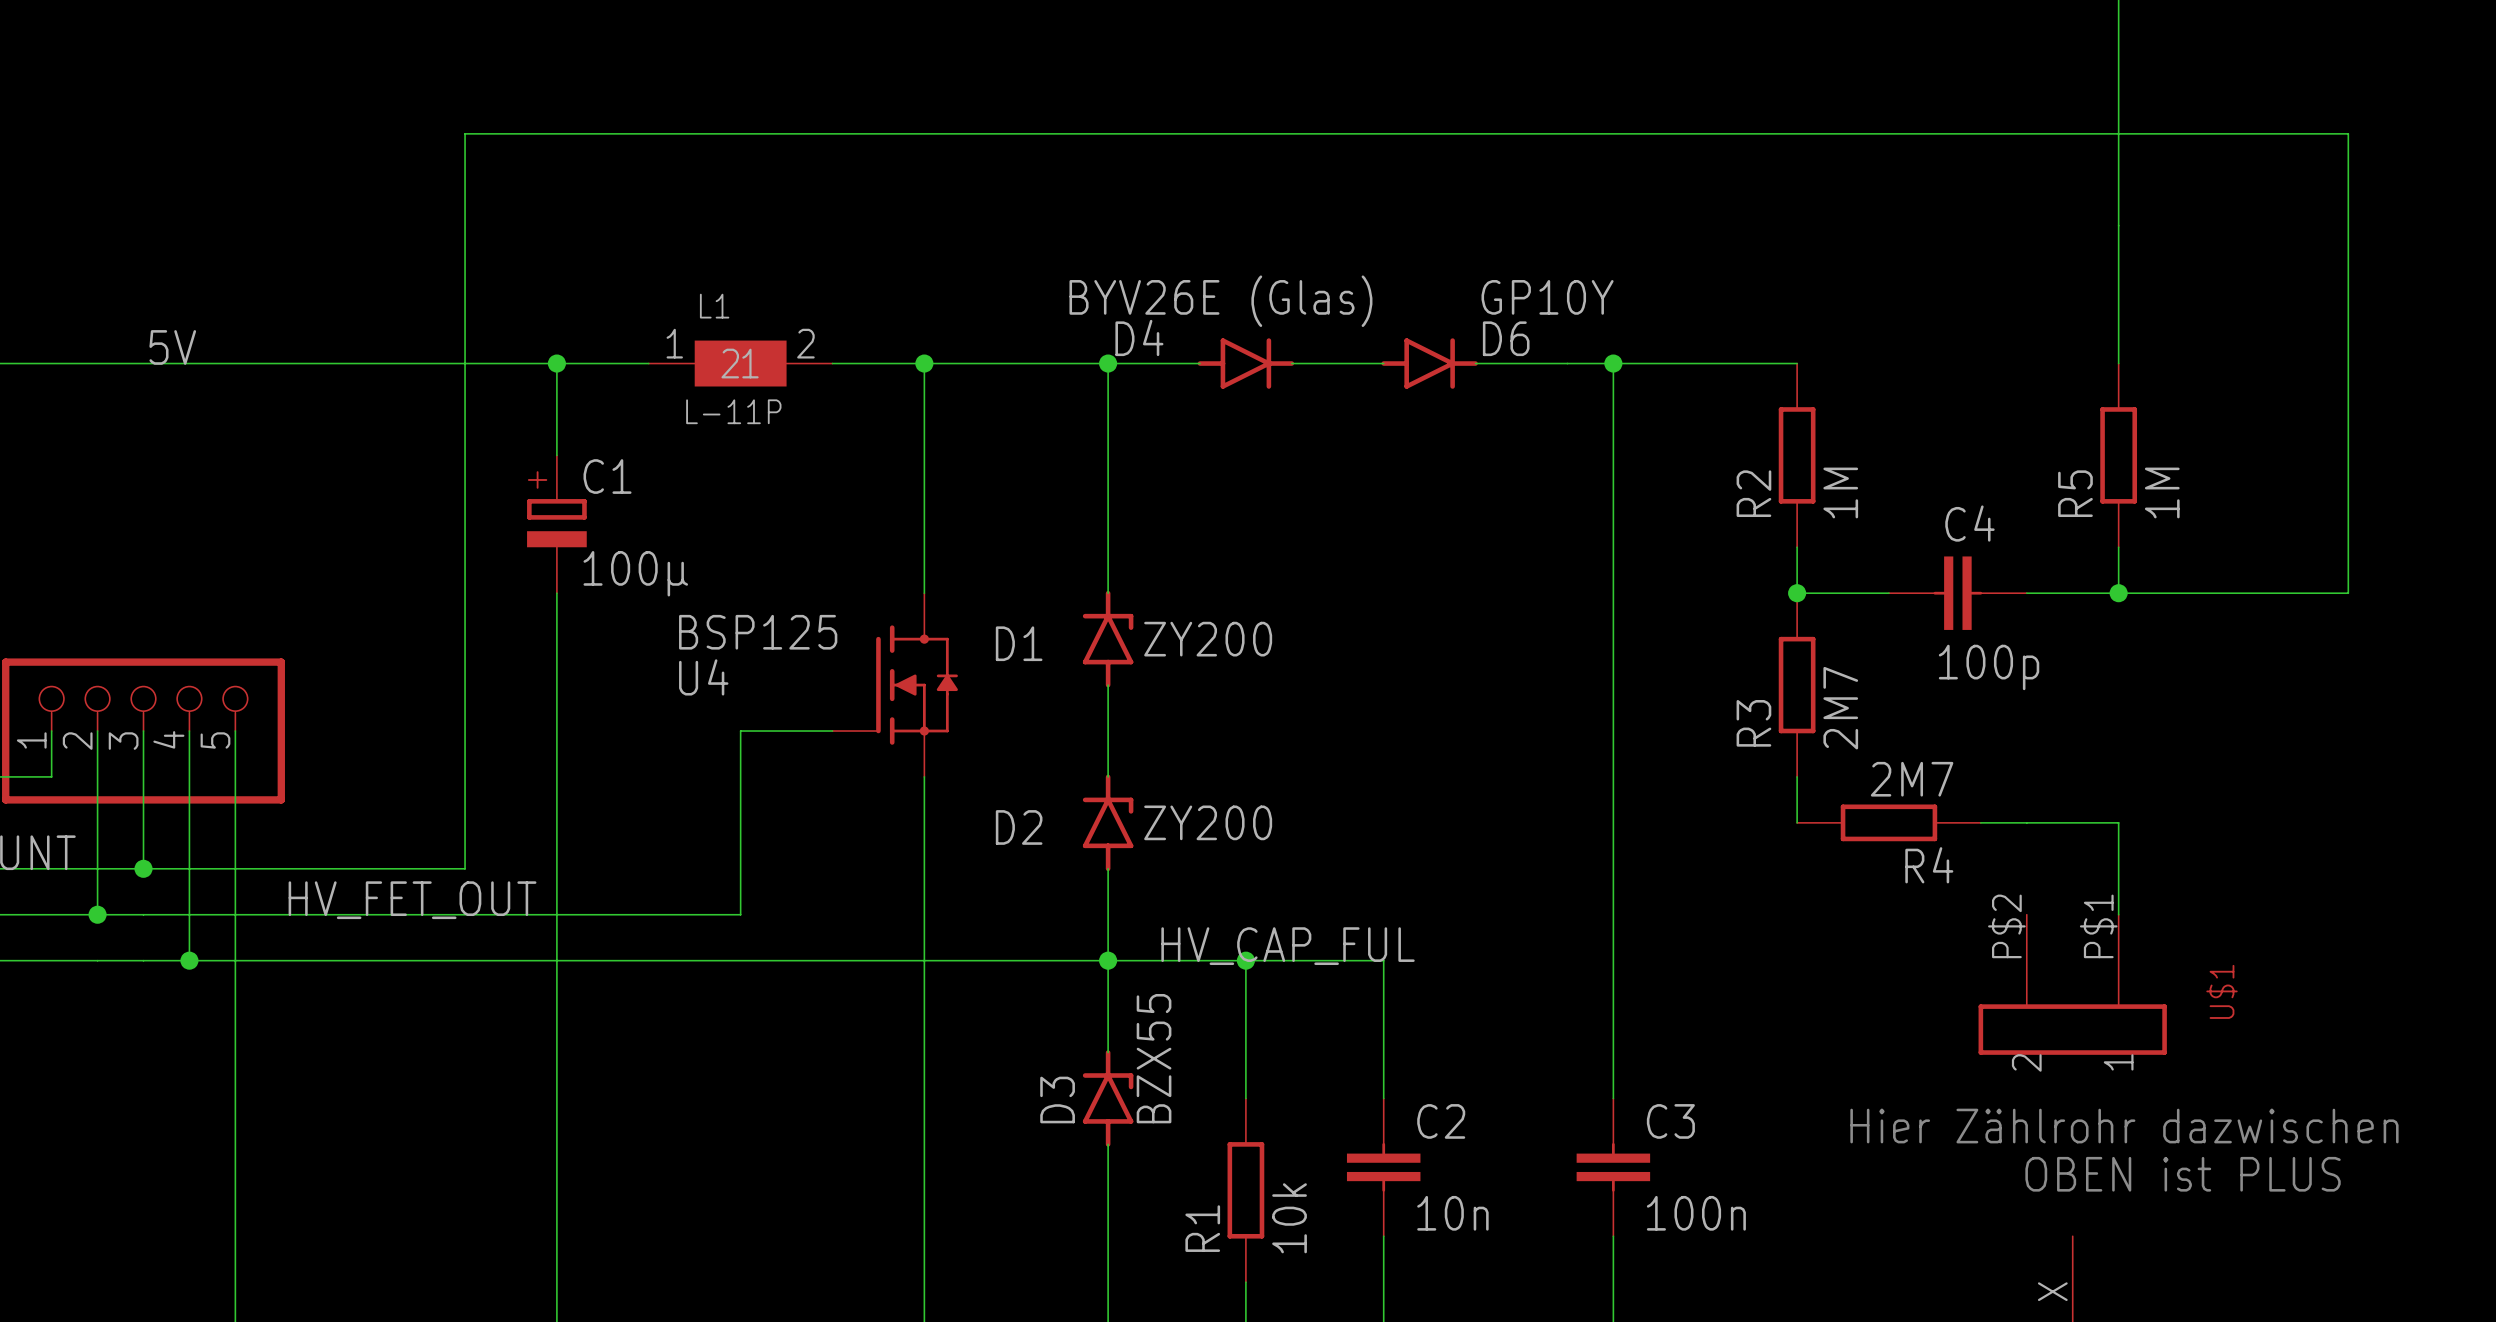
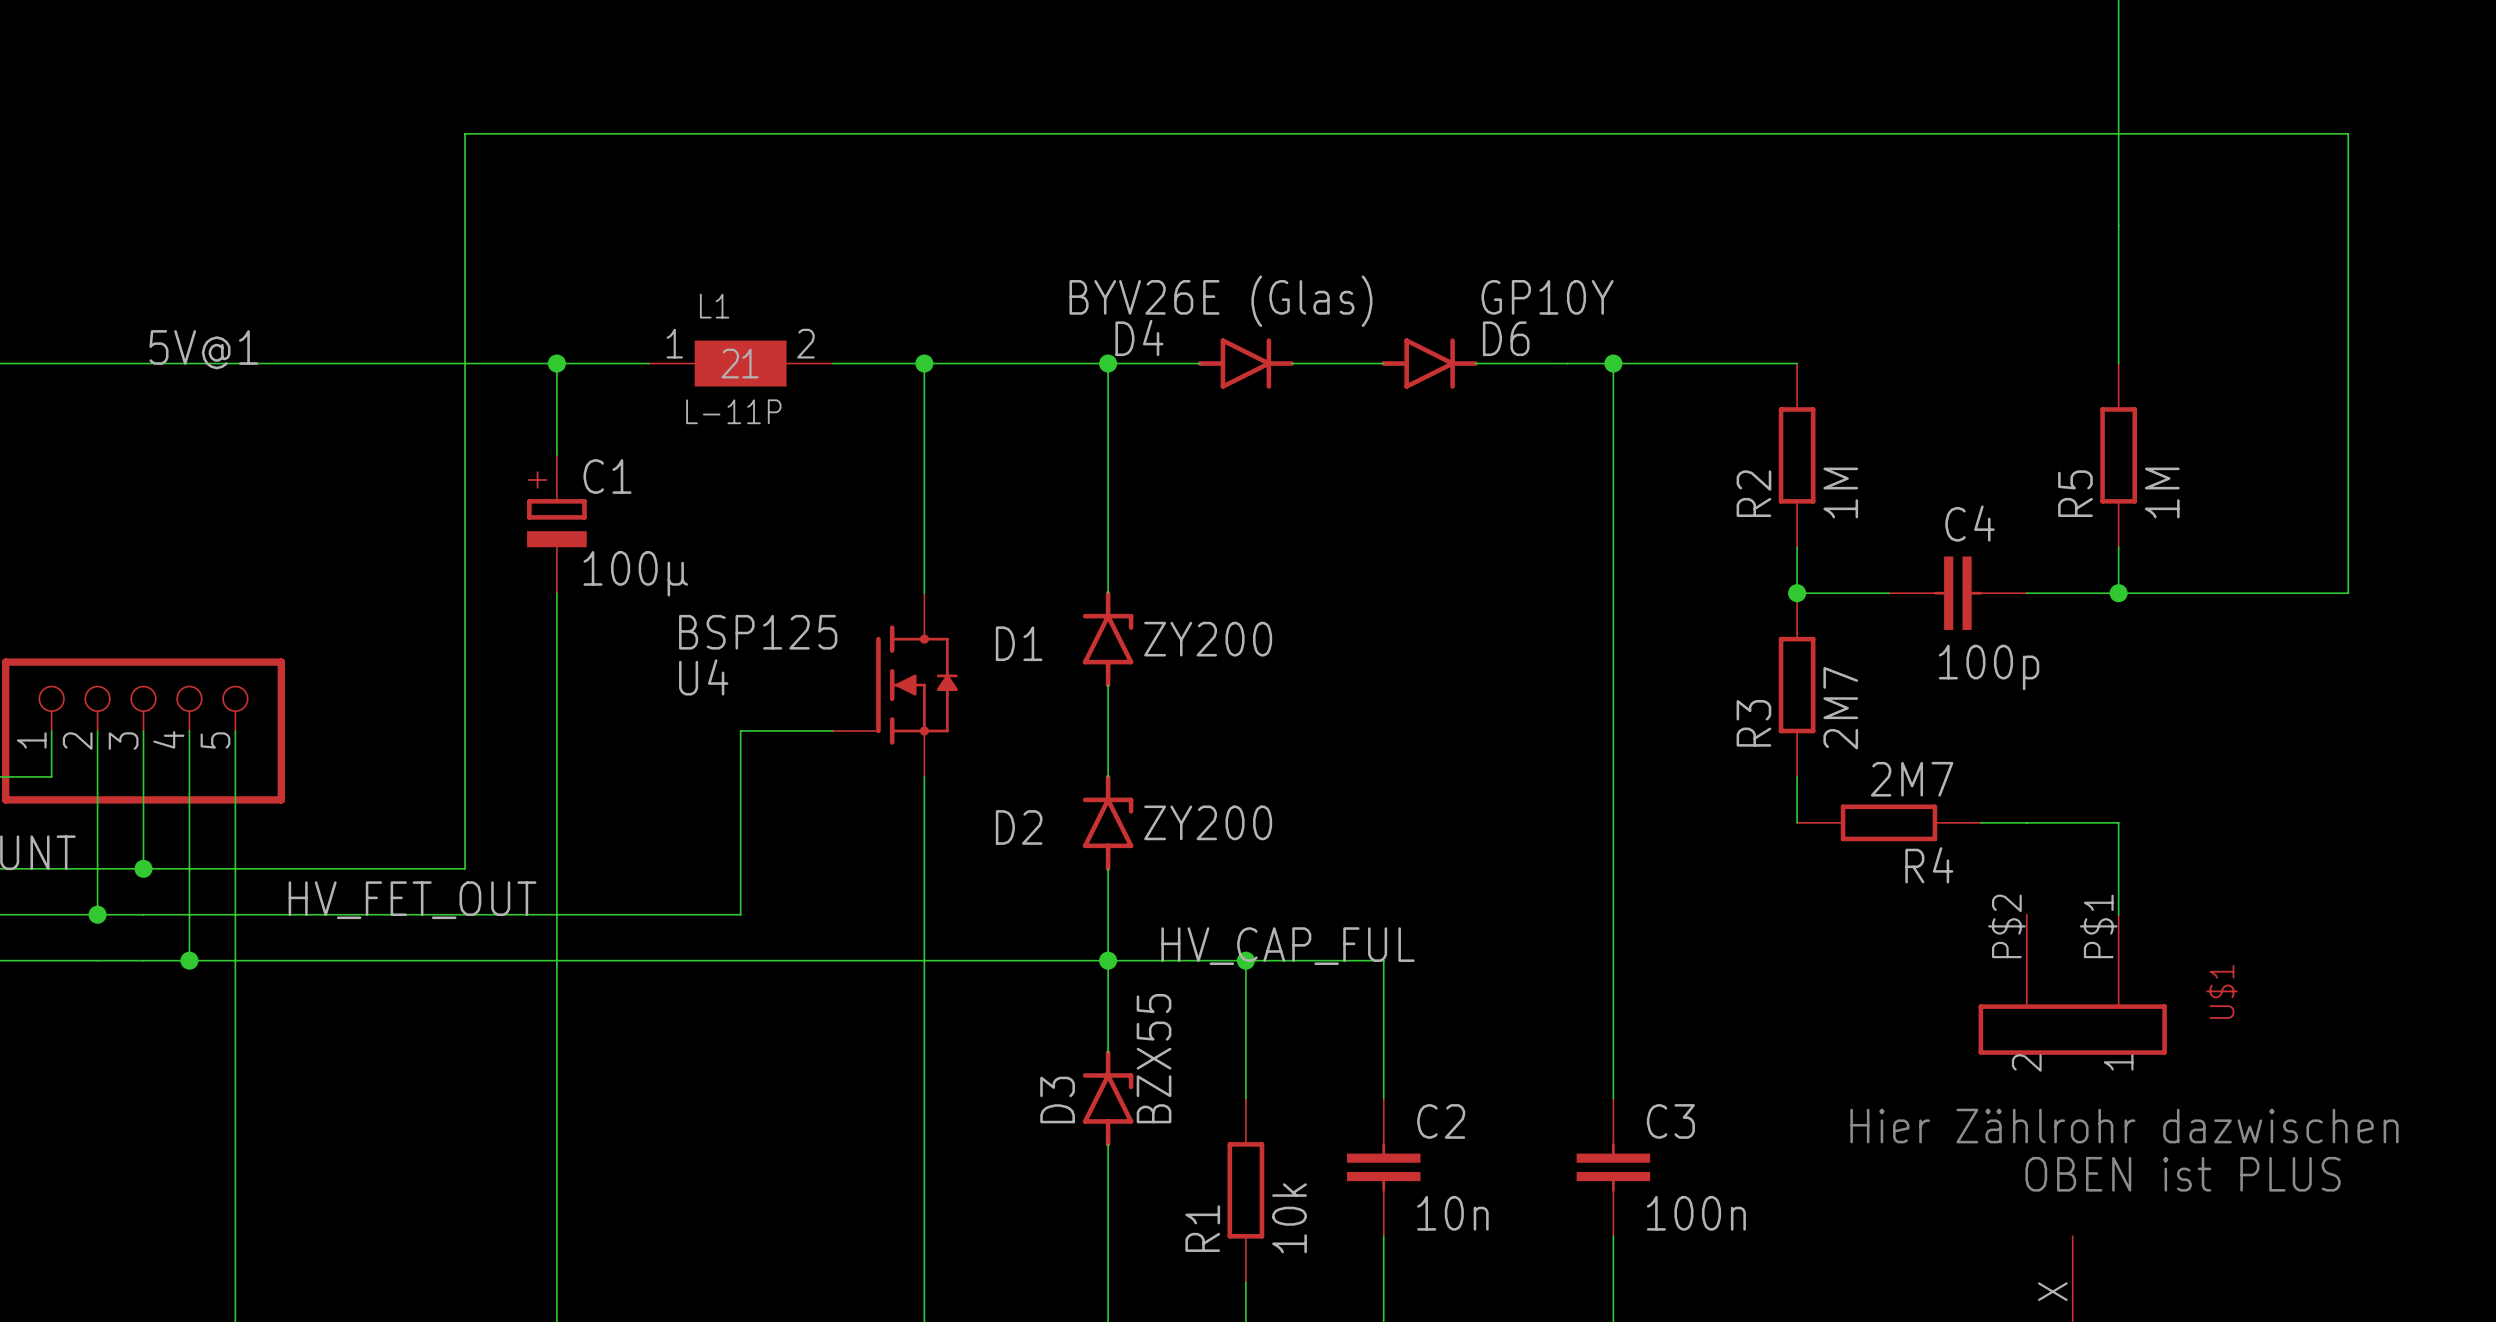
label: 5V (172, 347) -> 5V@1 (203, 349)

